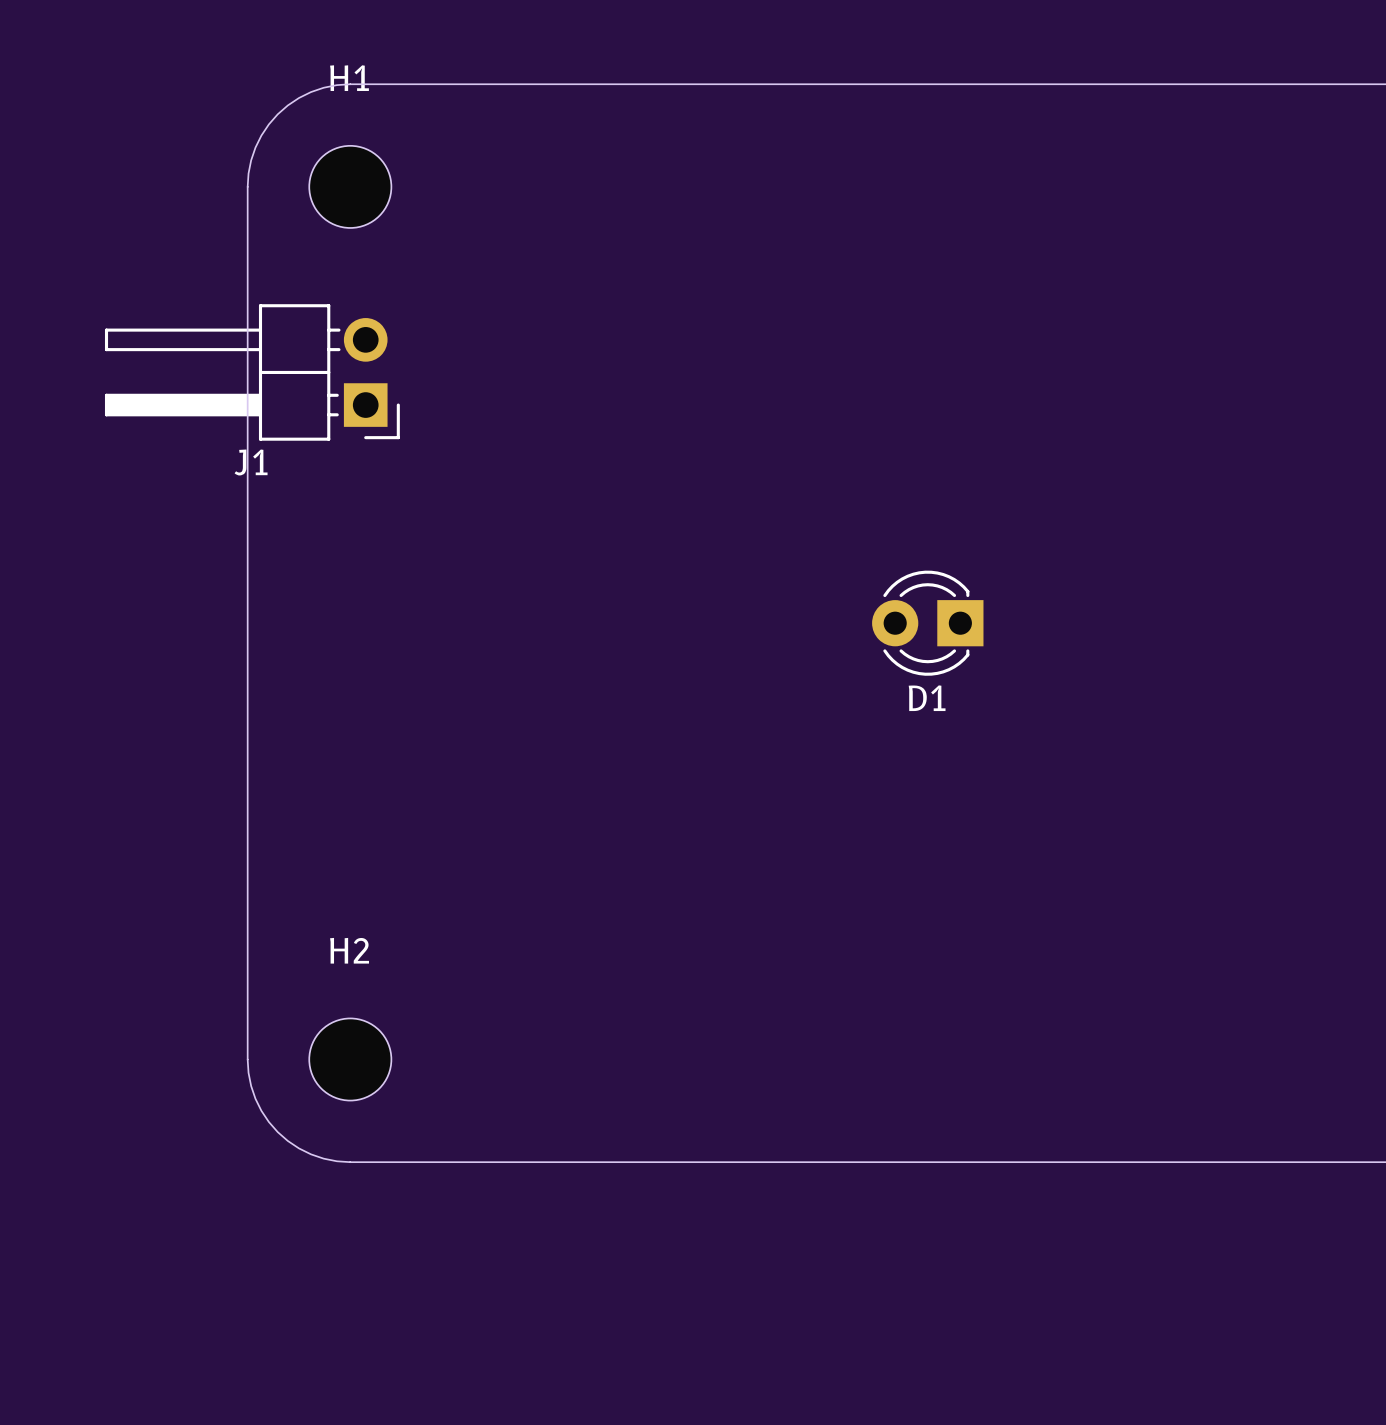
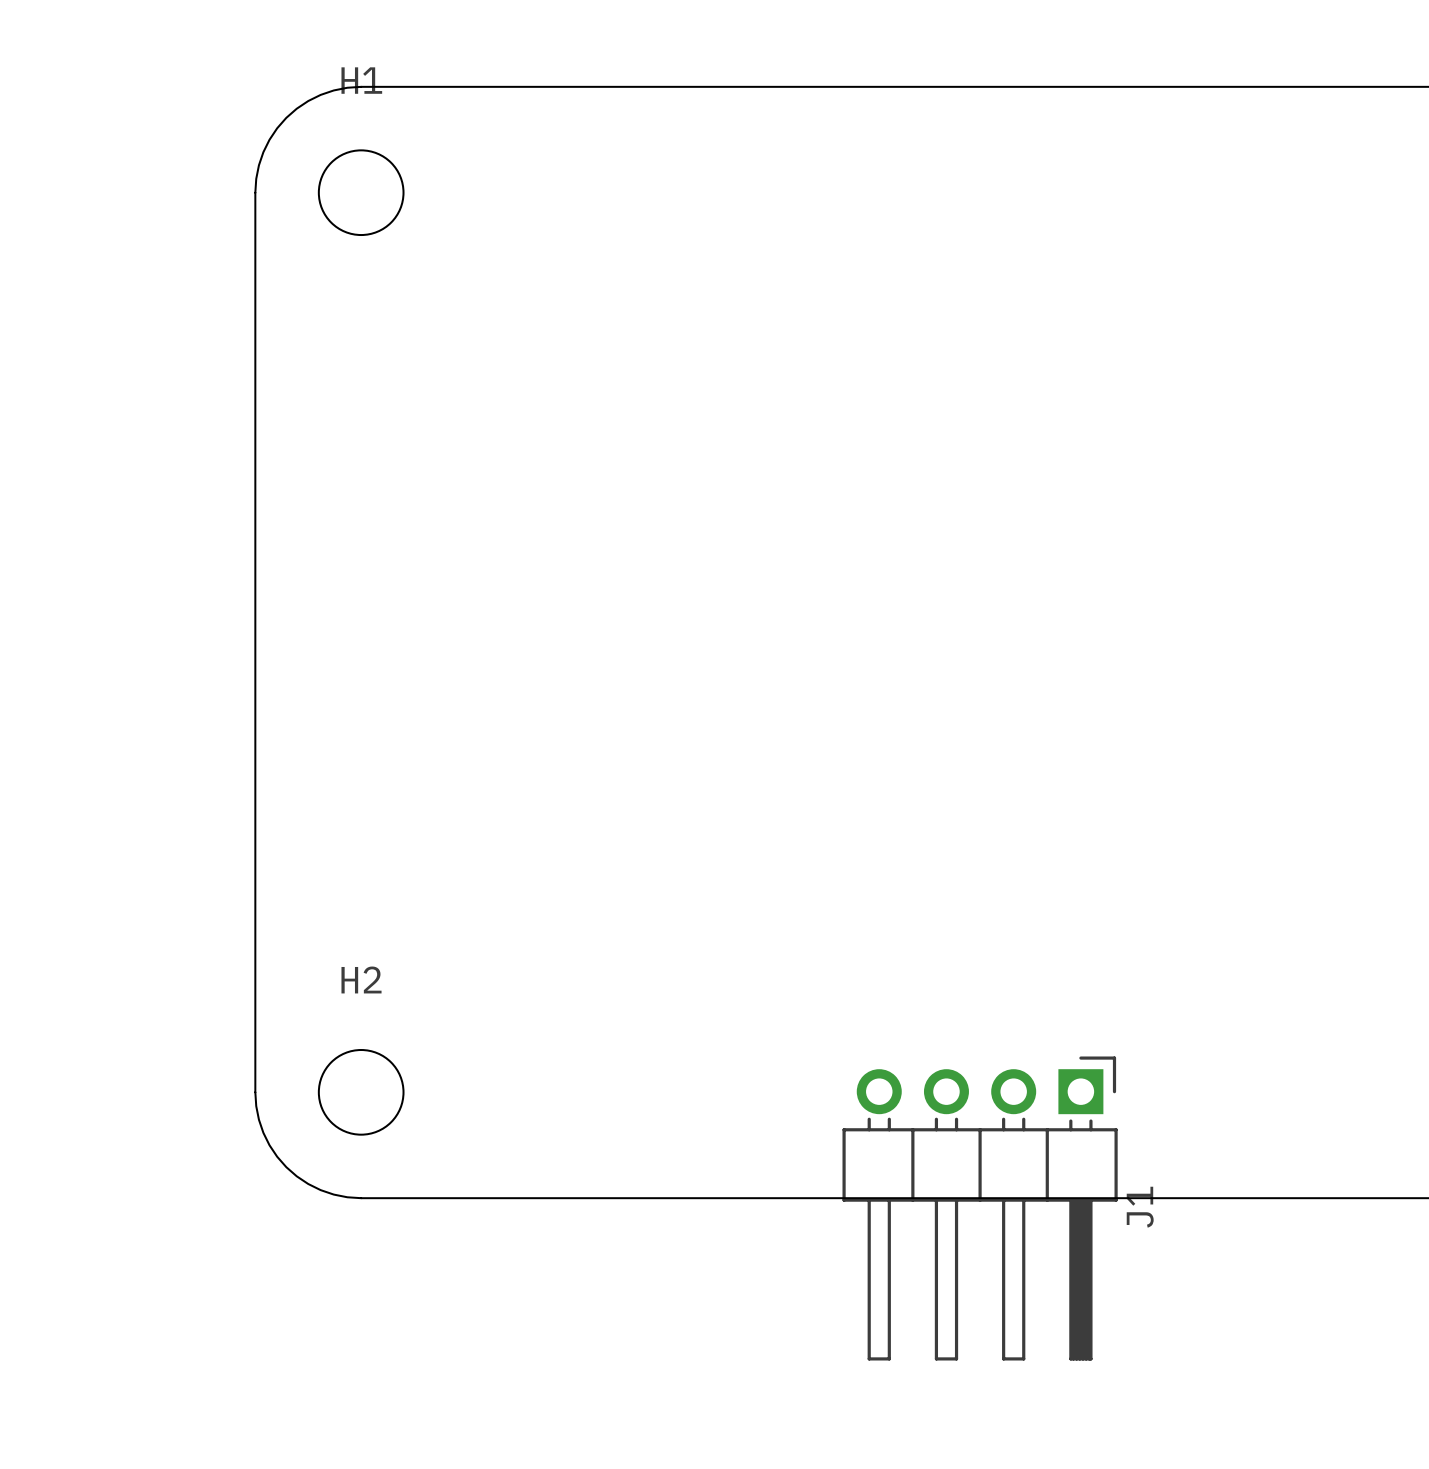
J1 footprint: [104, 304, 400, 441] -> [842, 1056, 1118, 1361]
J1 name position: J1 (251, 462) -> J1 (1140, 1207)
D1: (927, 623) -> none

